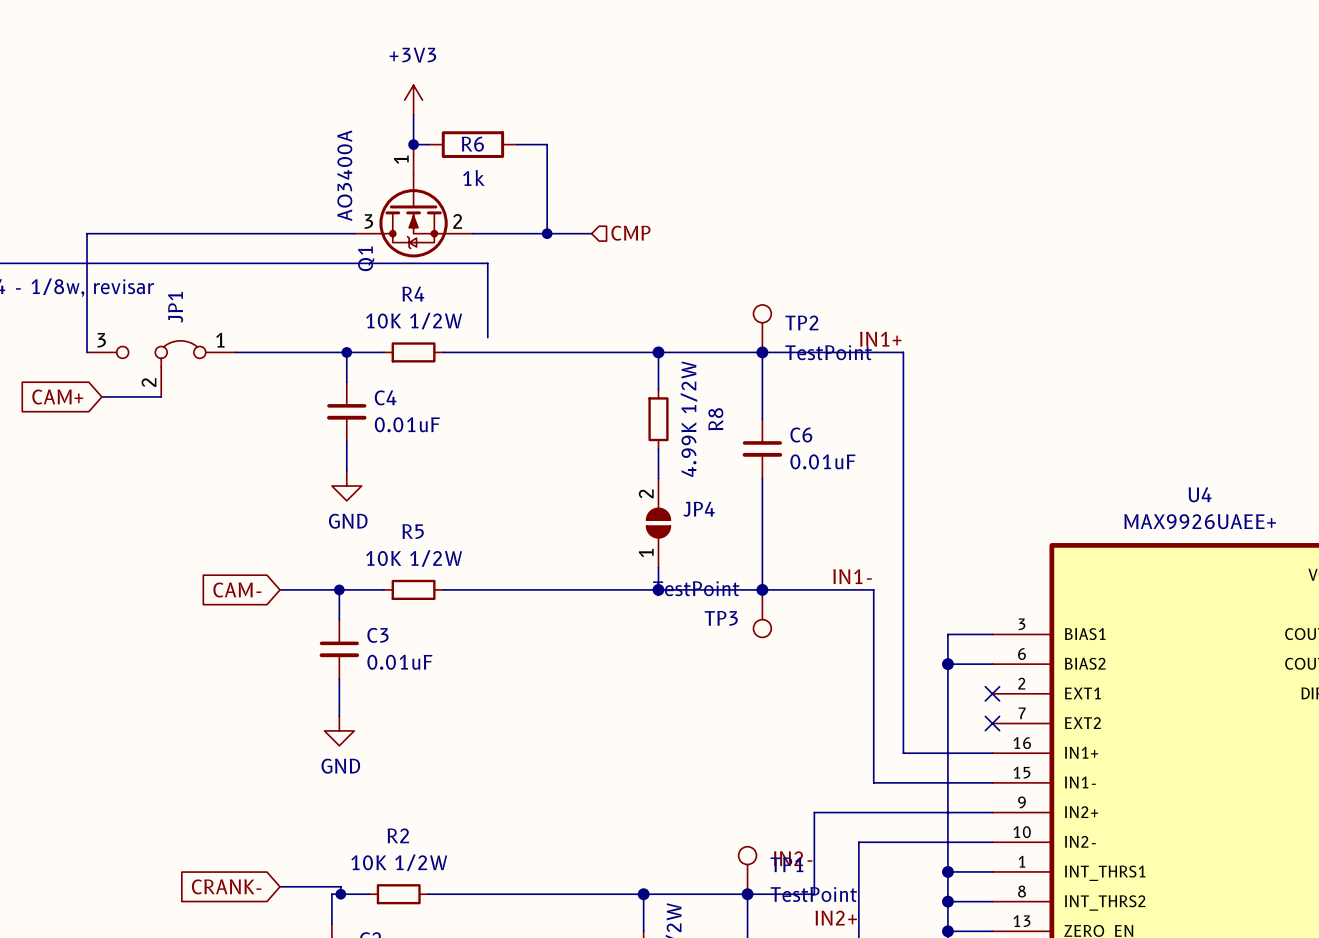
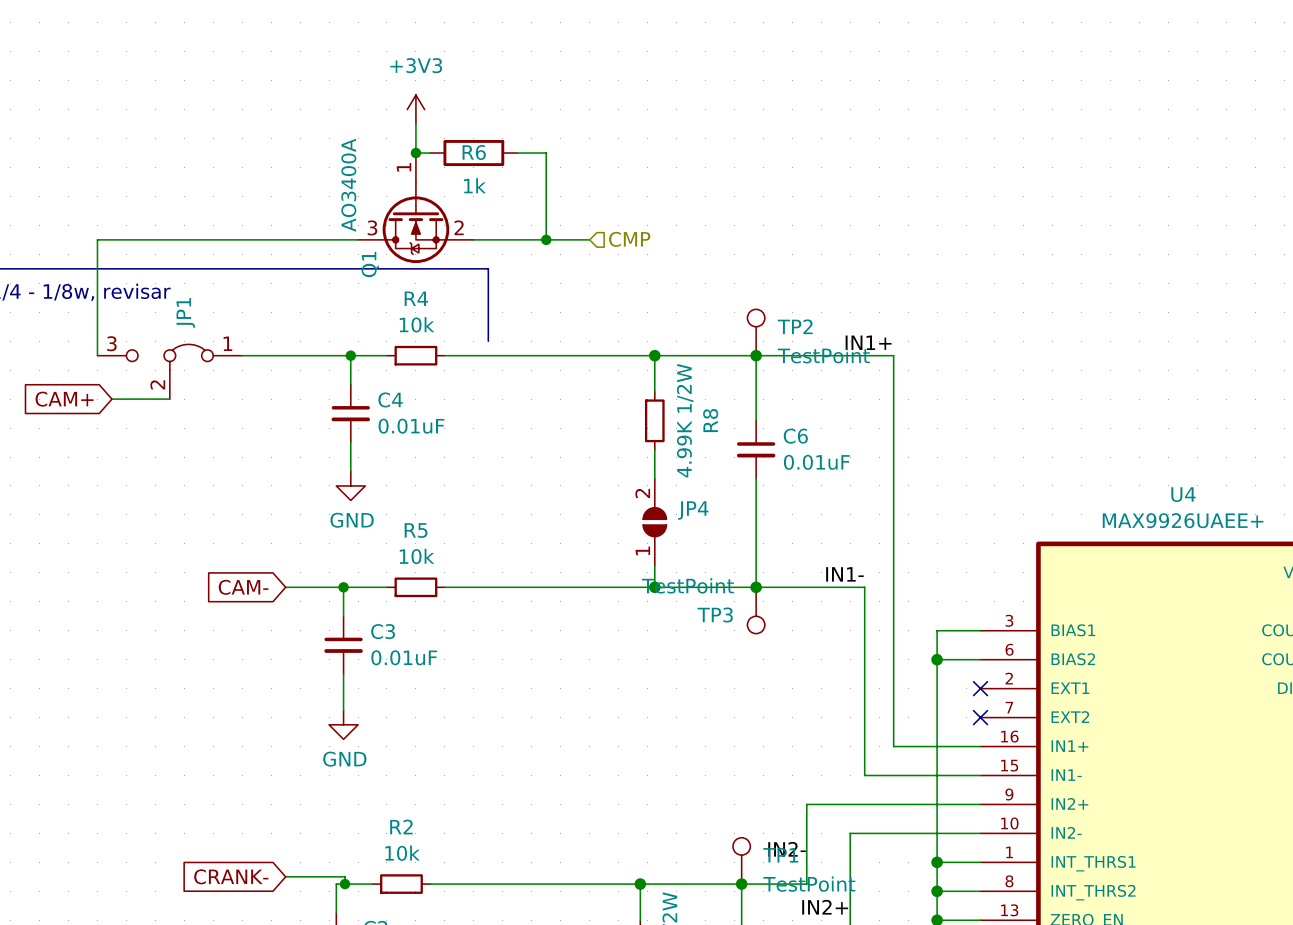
R4 value: 10K 1/2W (414, 321) -> 10k (417, 324)
R5 value: 10K 1/2W (414, 558) -> 10k (417, 556)
R2 value: 10K 1/2W (399, 862) -> 10k (402, 853)

